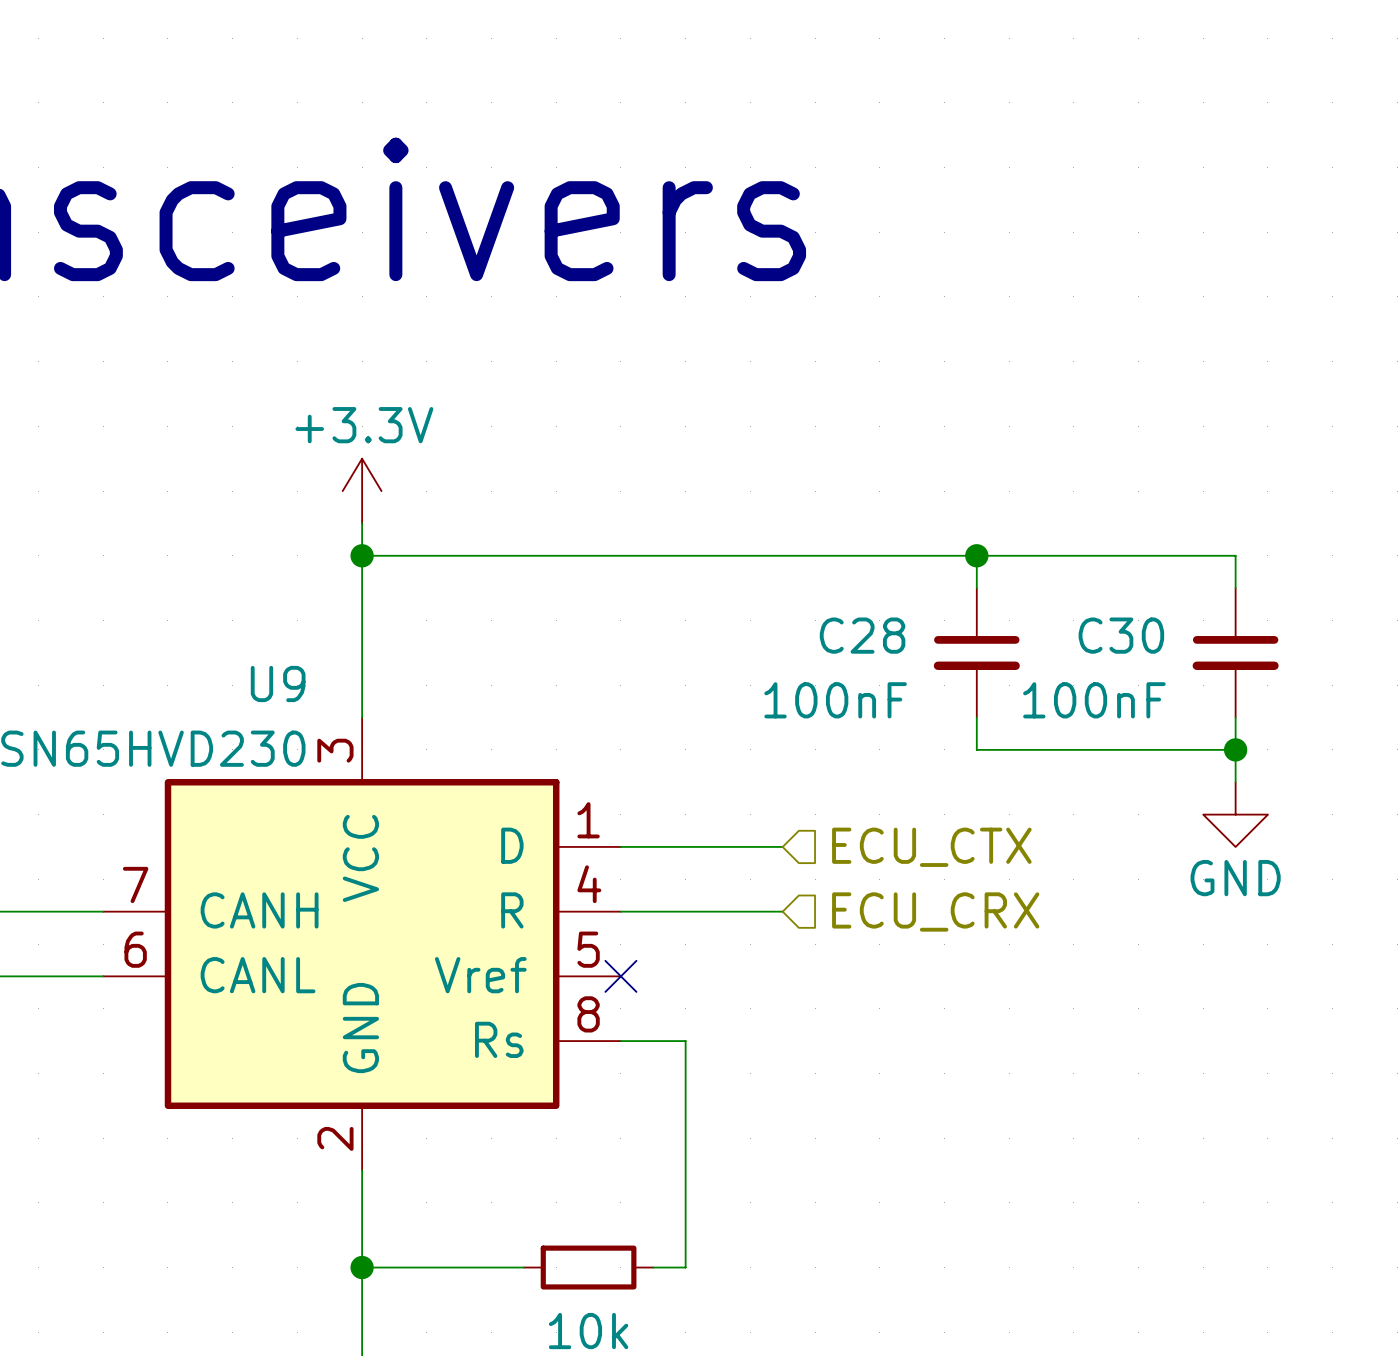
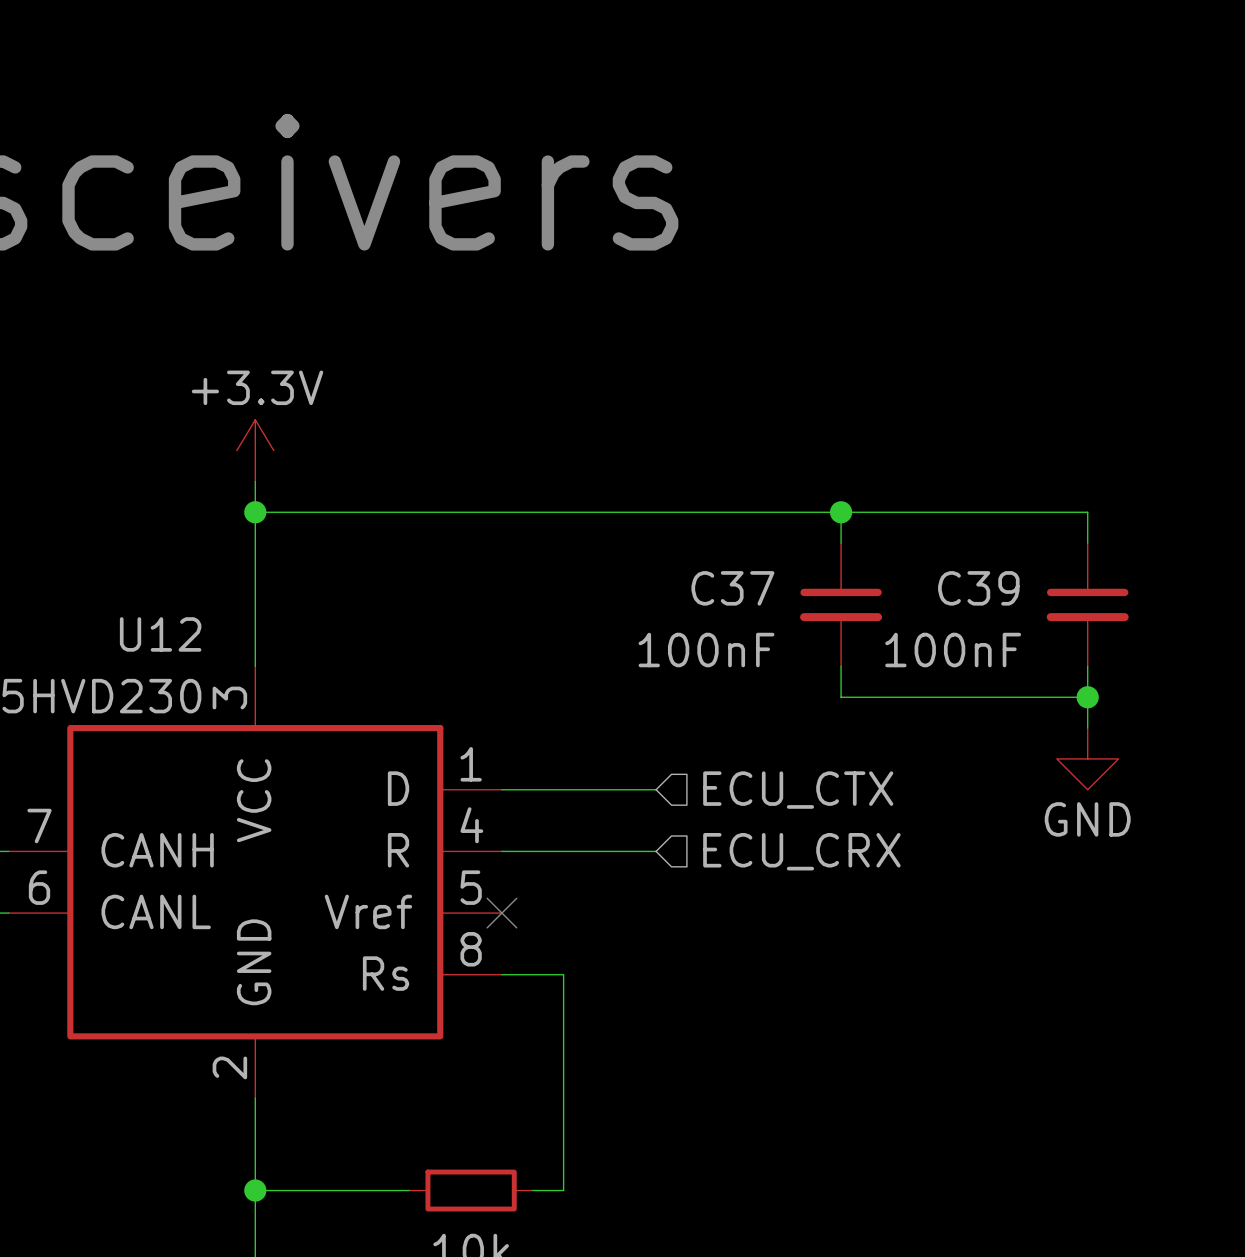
C28 name: C28 (862, 635) -> C37 (732, 588)
C30 name: C30 (1121, 635) -> C39 (978, 588)
U9 name: U9 (278, 683) -> U12 (160, 634)

